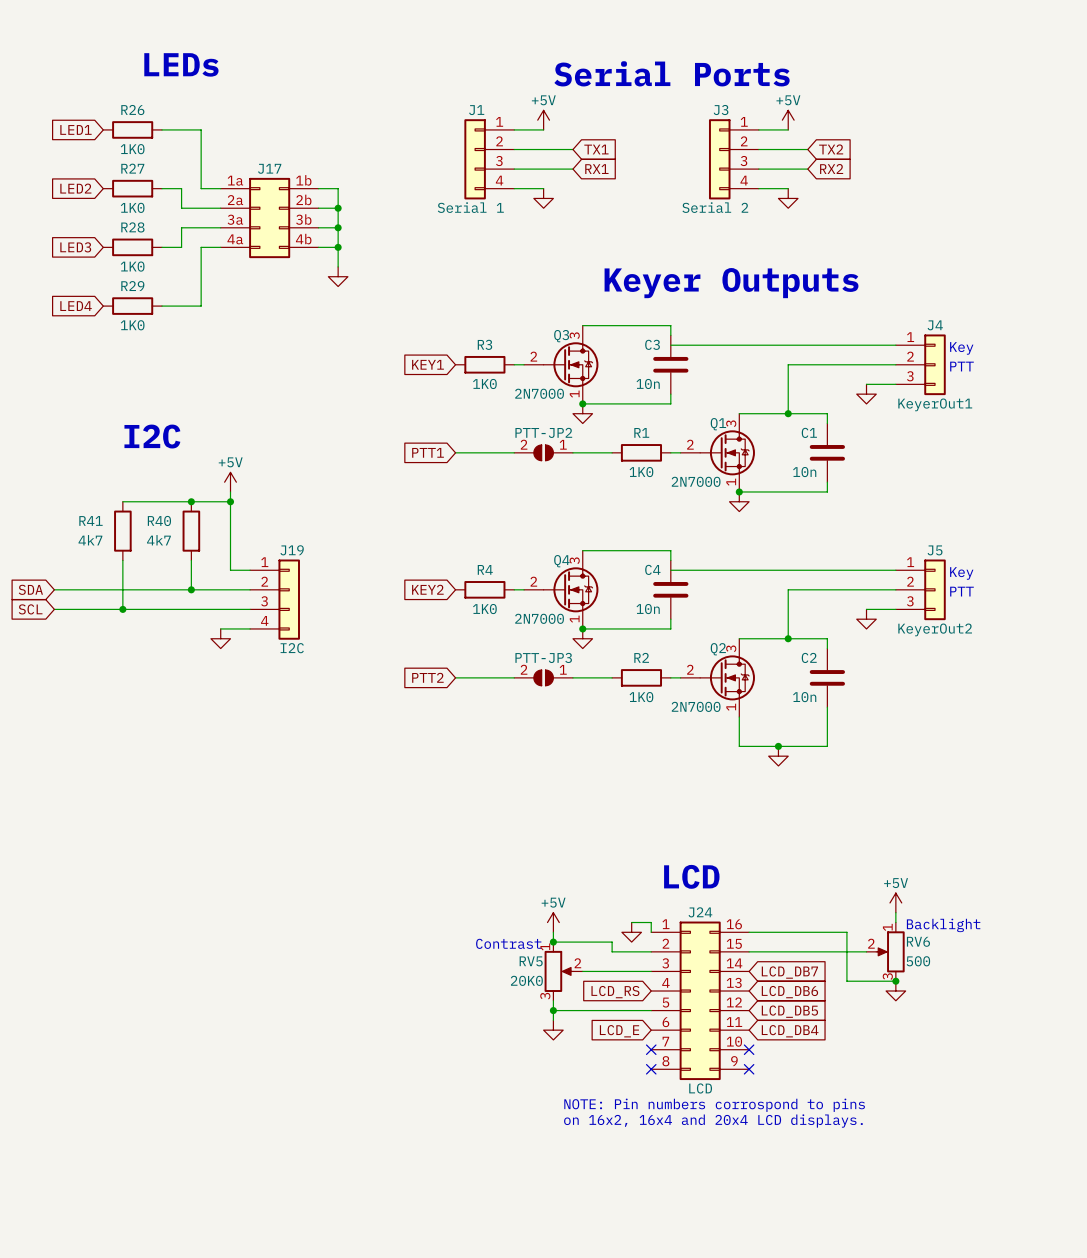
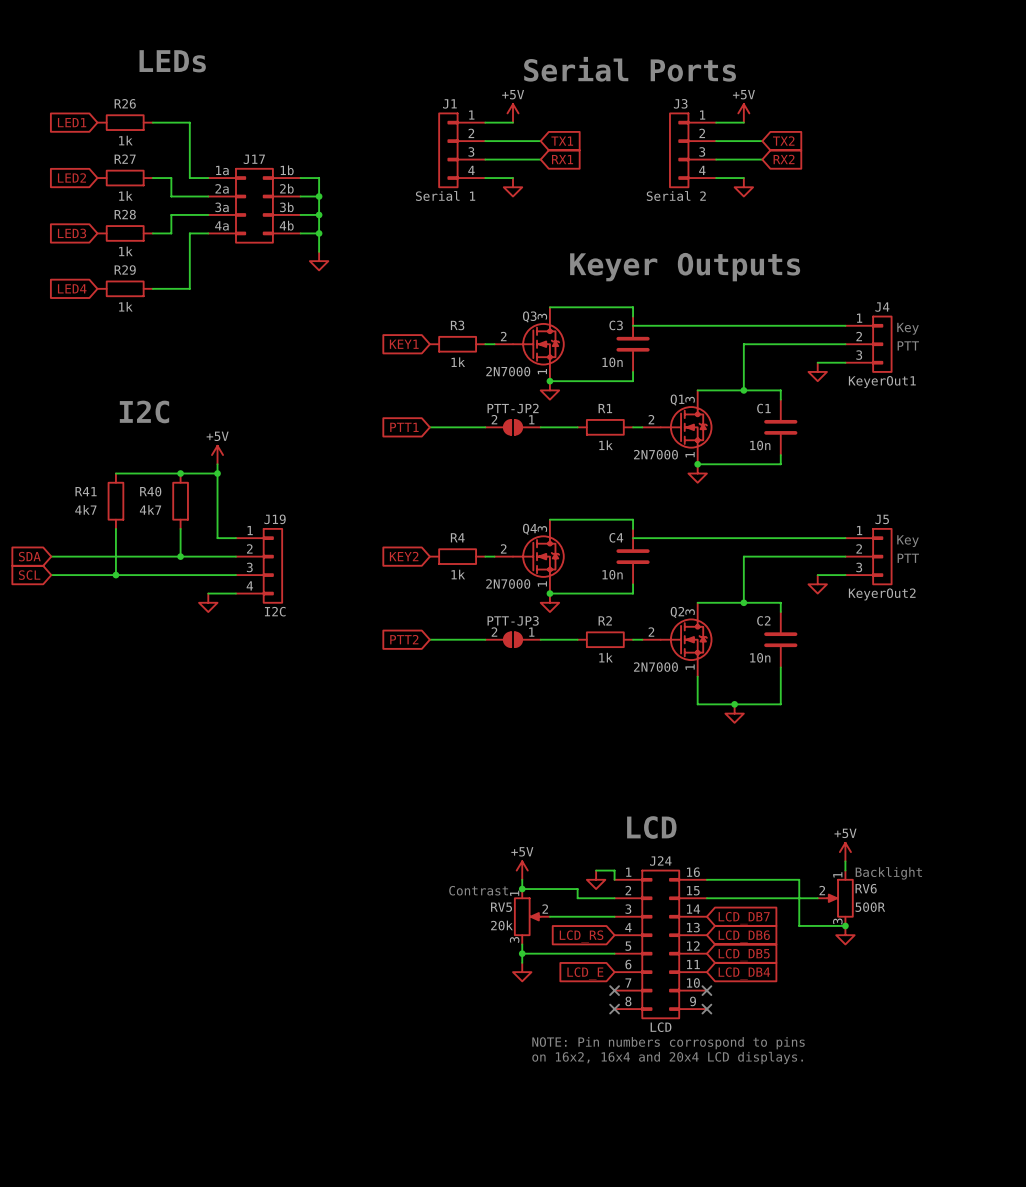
R26 value: 1K0 (132, 149) -> 1k (125, 140)
R27 value: 1K0 (132, 207) -> 1k (125, 195)
R28 value: 1K0 (132, 266) -> 1k (125, 251)
R29 value: 1K0 (132, 325) -> 1k (125, 306)
R3 value: 1K0 (484, 383) -> 1k (458, 362)
R1 value: 1K0 (641, 472) -> 1k (606, 445)
R4 value: 1K0 (484, 609) -> 1k (458, 574)
R2 value: 1K0 (641, 697) -> 1k (606, 657)
RV6 value: 500 (918, 961) -> 500R (870, 907)
RV5 value: 20K0 (526, 980) -> 20k (501, 925)

